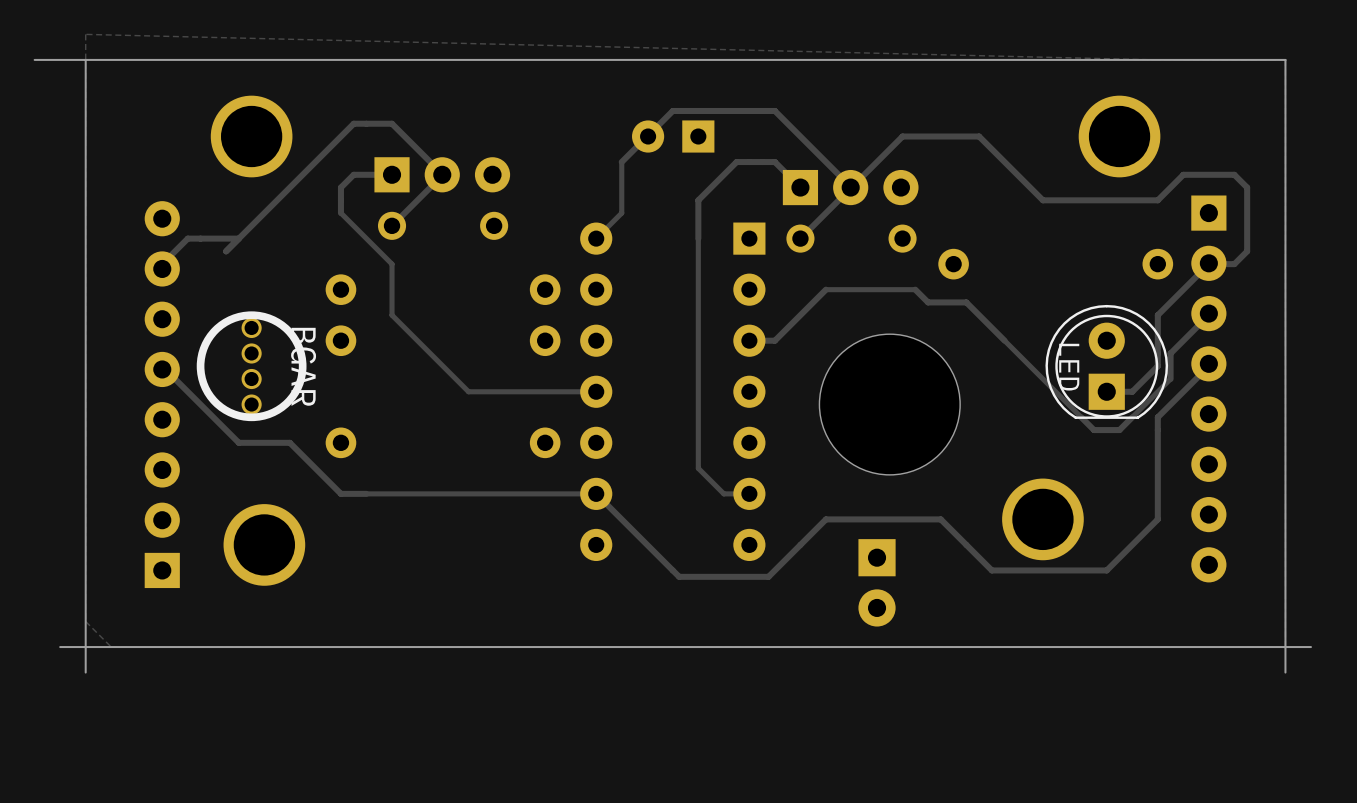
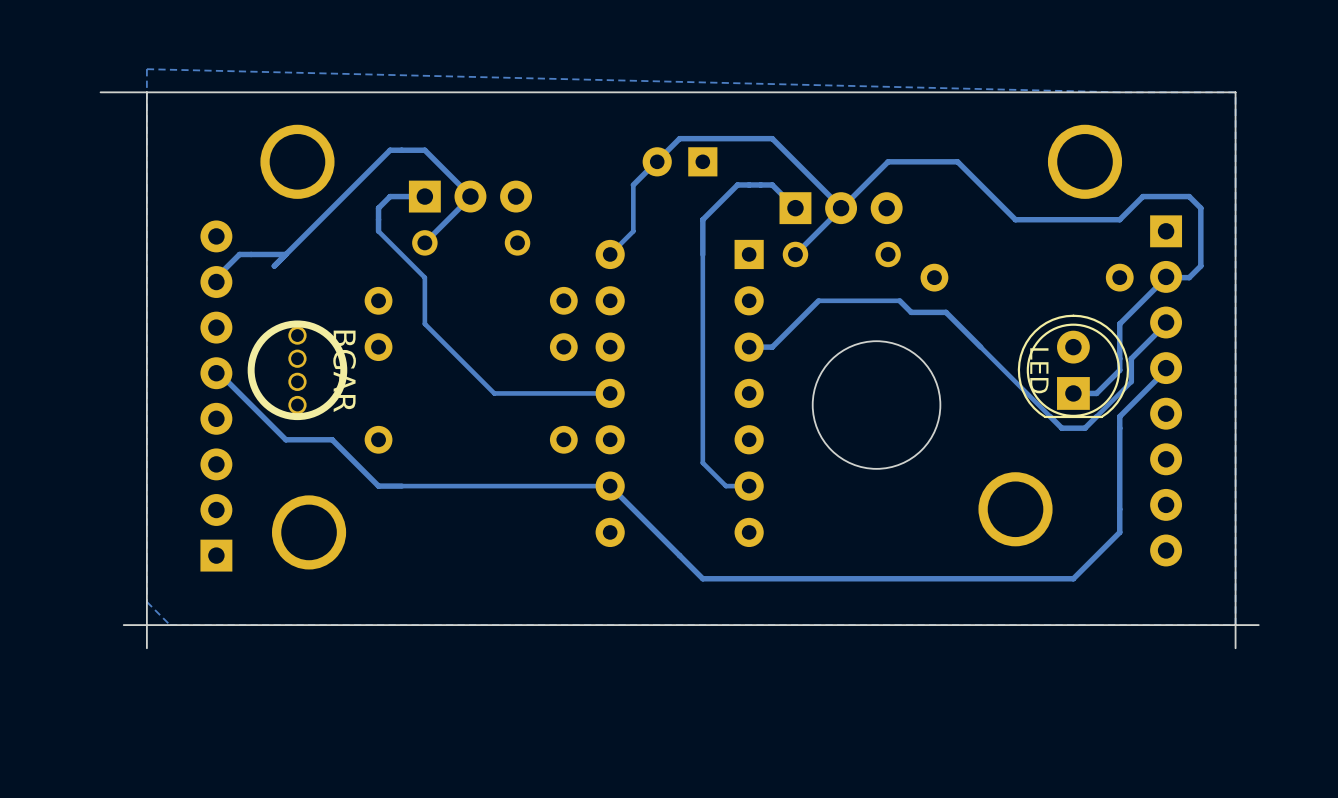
track: (1157, 519) (1106, 570) (991, 570) (940, 519) (825, 519) (768, 576) (679, 576) -> (1119, 509) (1119, 532) (1073, 578) (702, 578) (685, 561)
part: (877, 582) -> none

